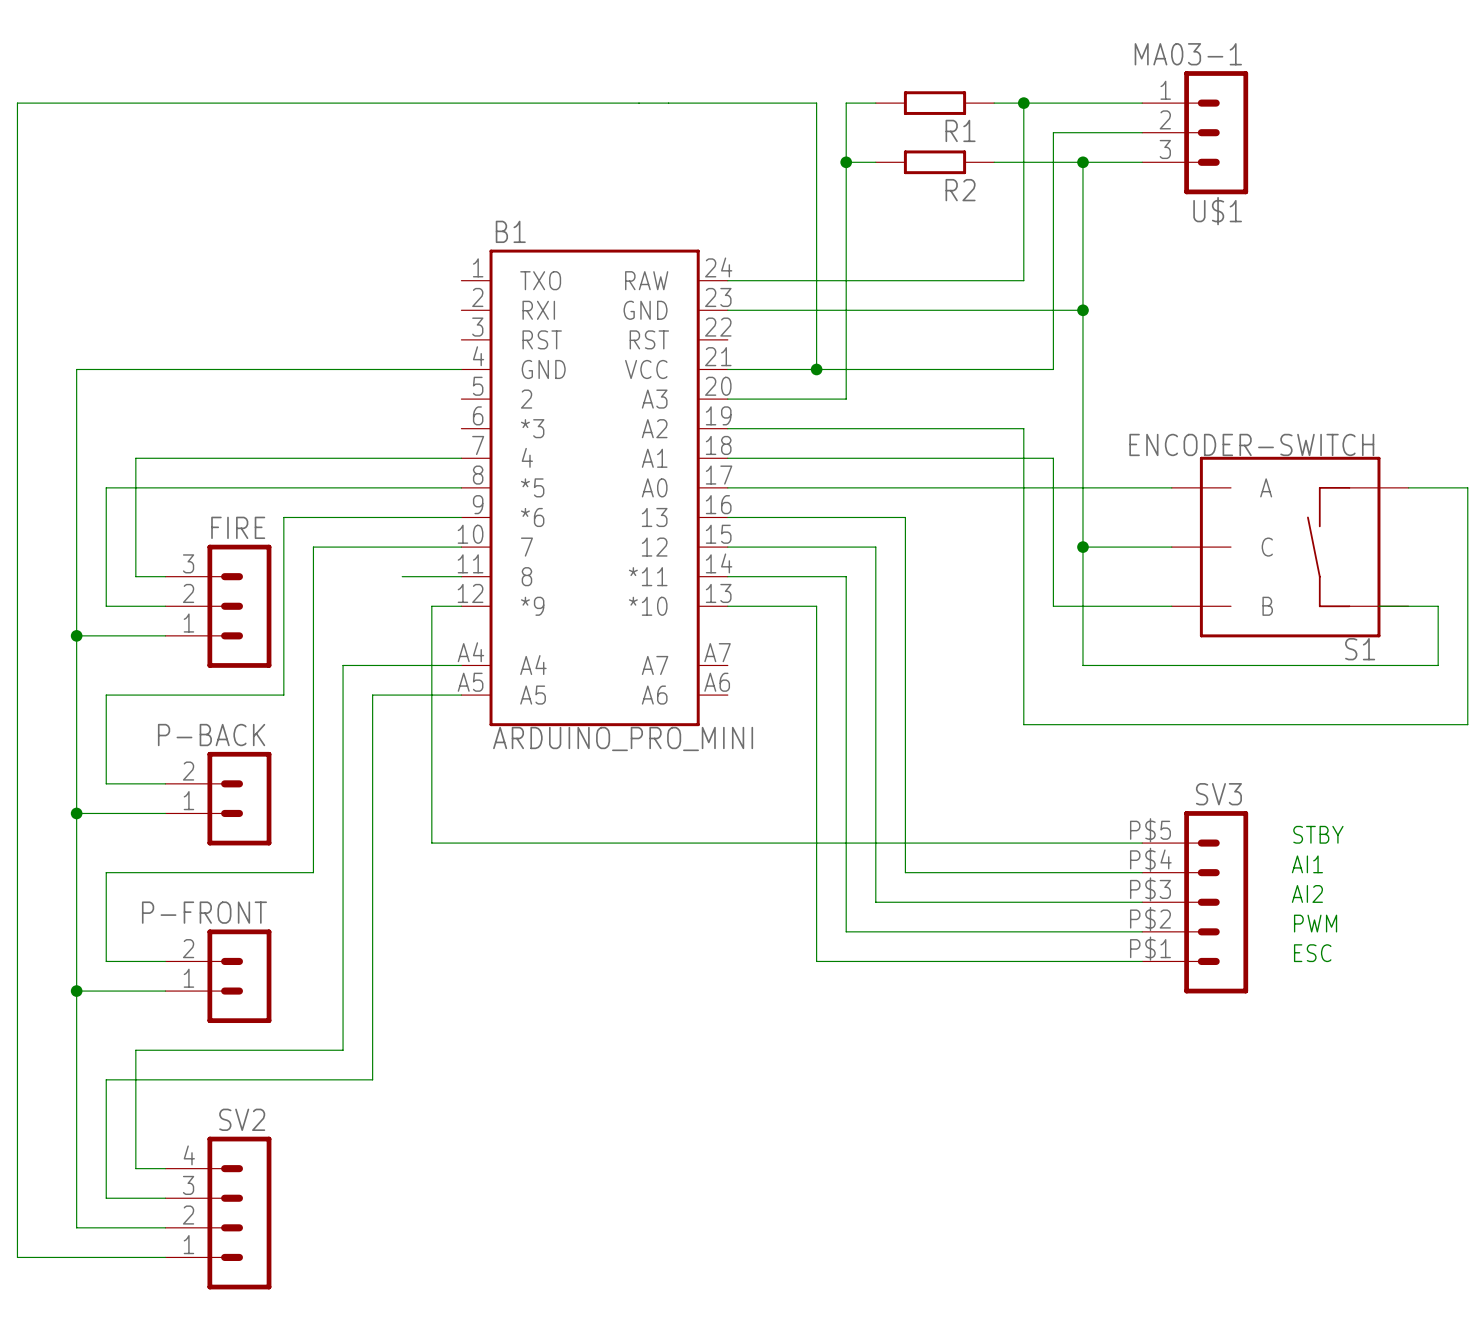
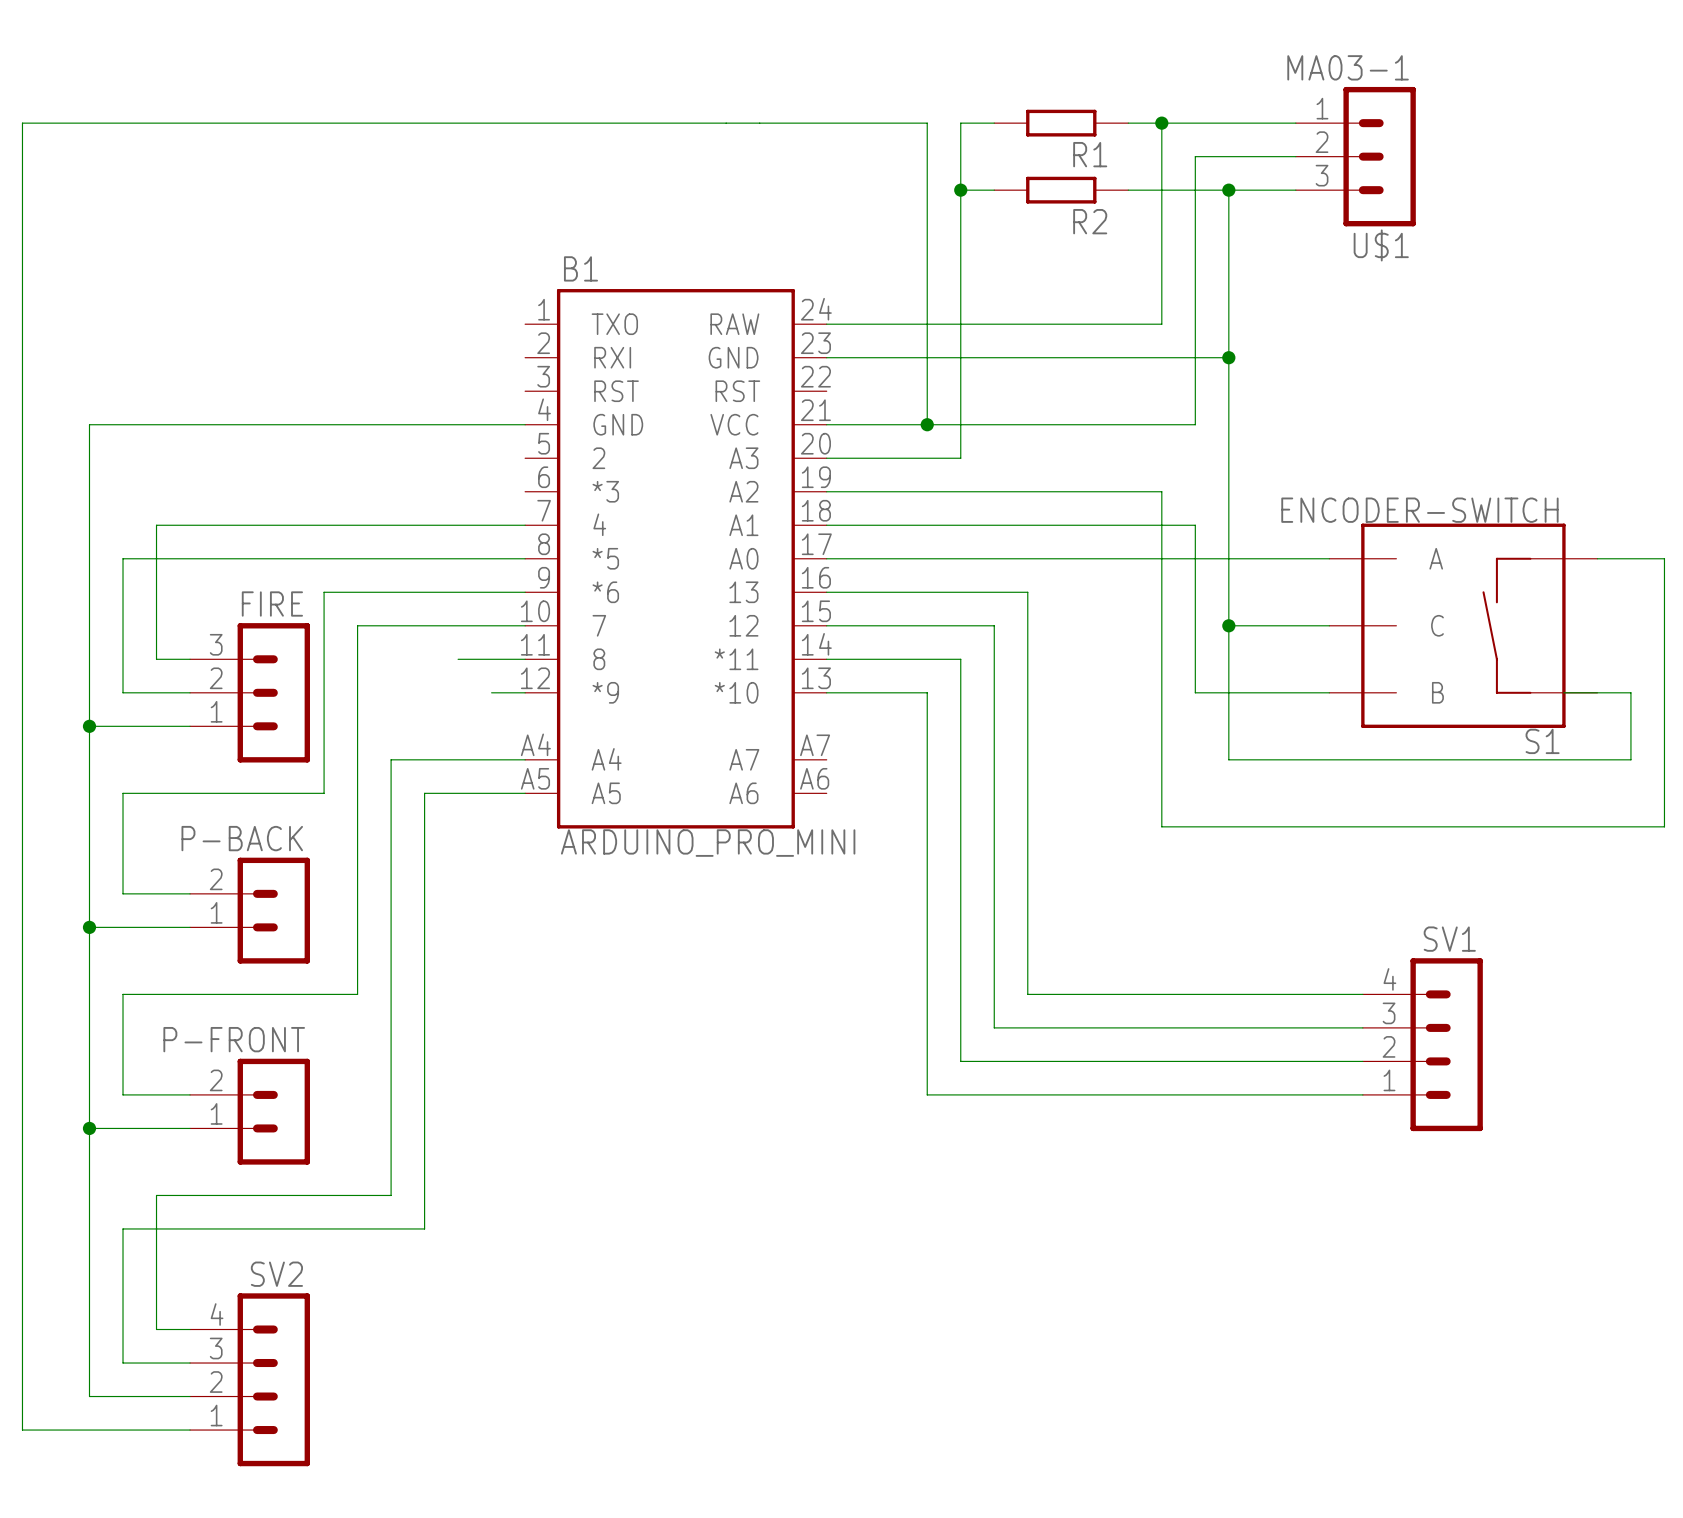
wire: (431, 606) (431, 843) (1142, 843) -> none
text: STBY (1318, 834) -> none
text: AI1 (1307, 864) -> none
text: AI2 (1307, 893) -> none
SV3: (1195, 902) -> none
SV1: none -> (1422, 1044)
text: PWM (1315, 923) -> none
text: ESC (1312, 953) -> none

